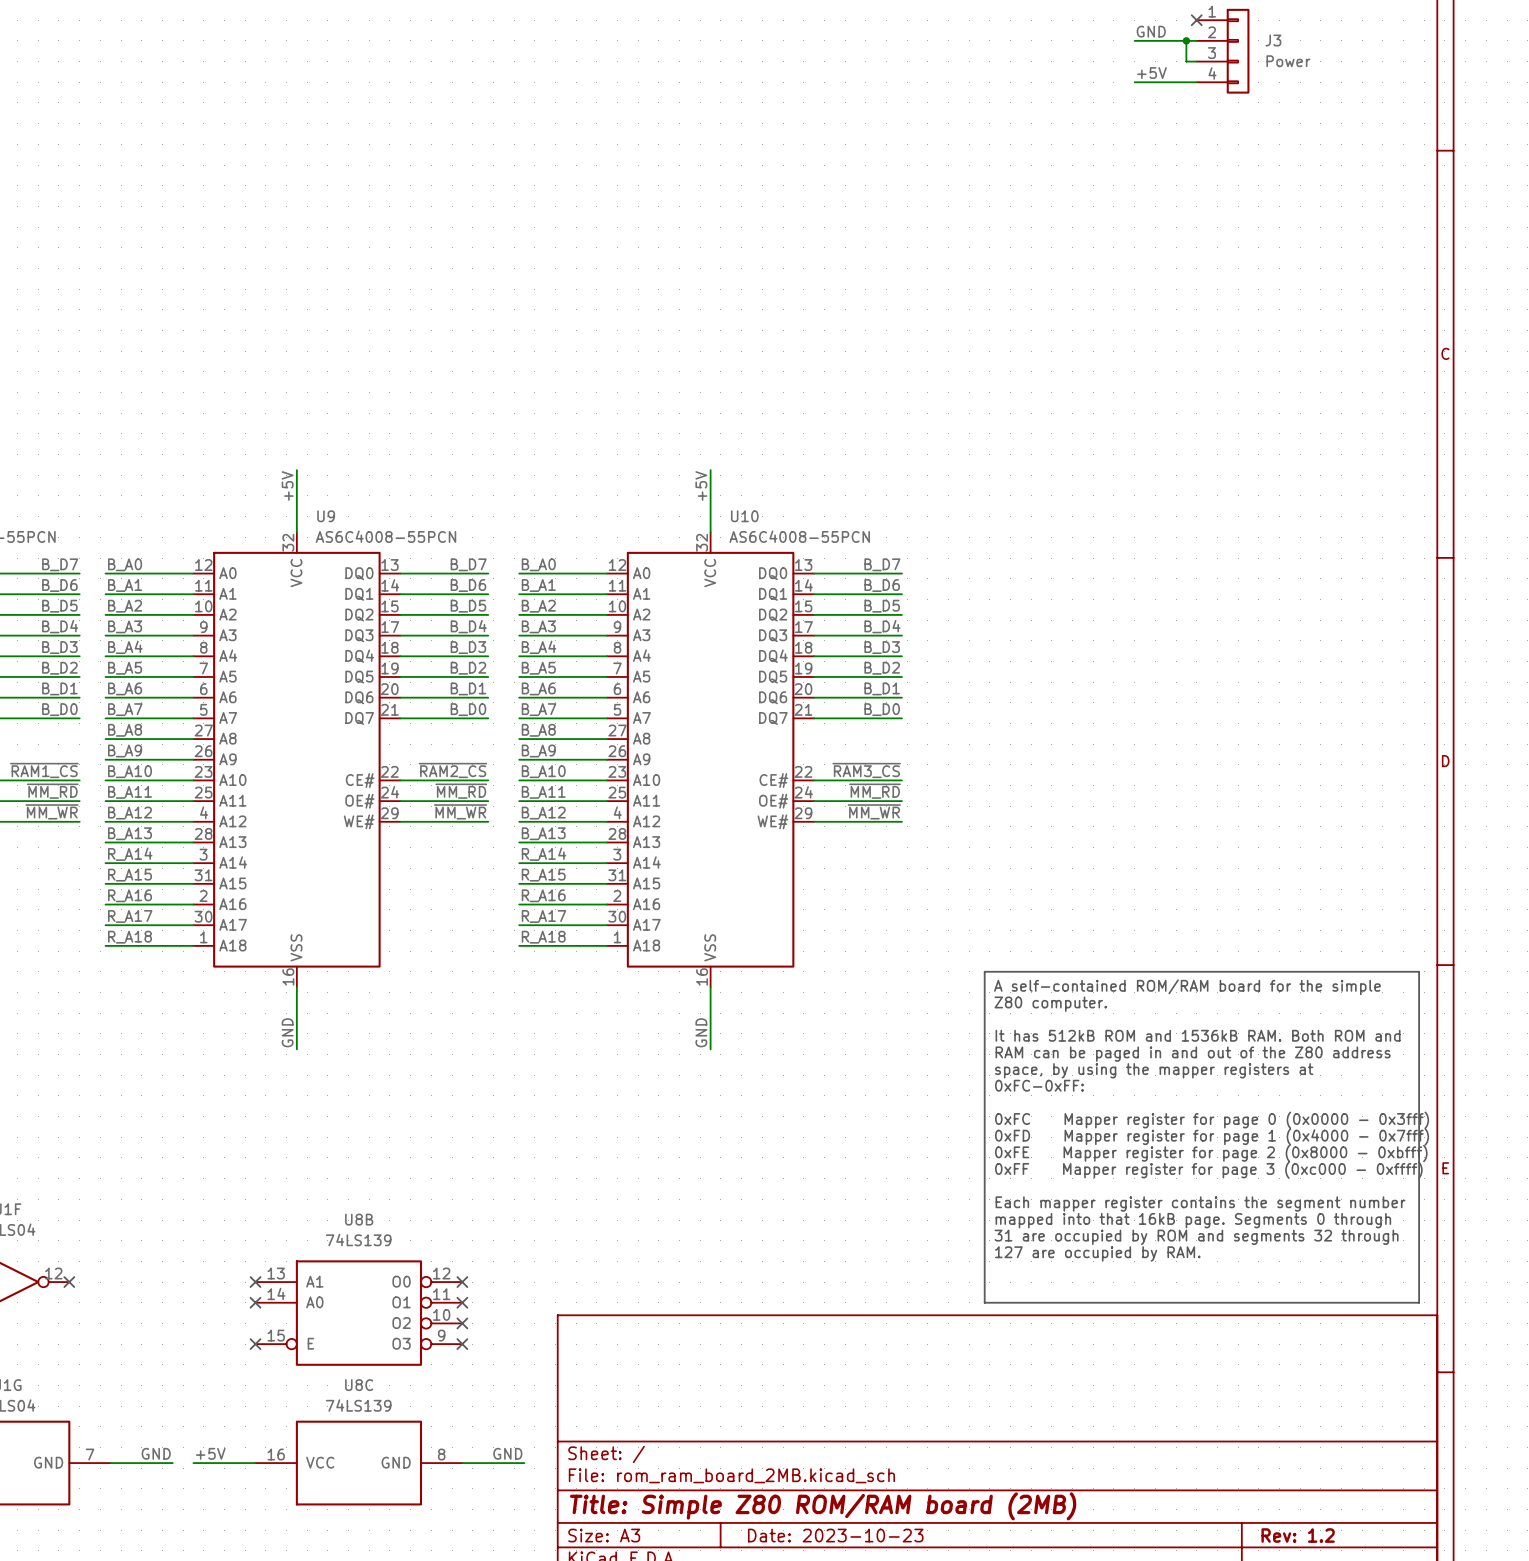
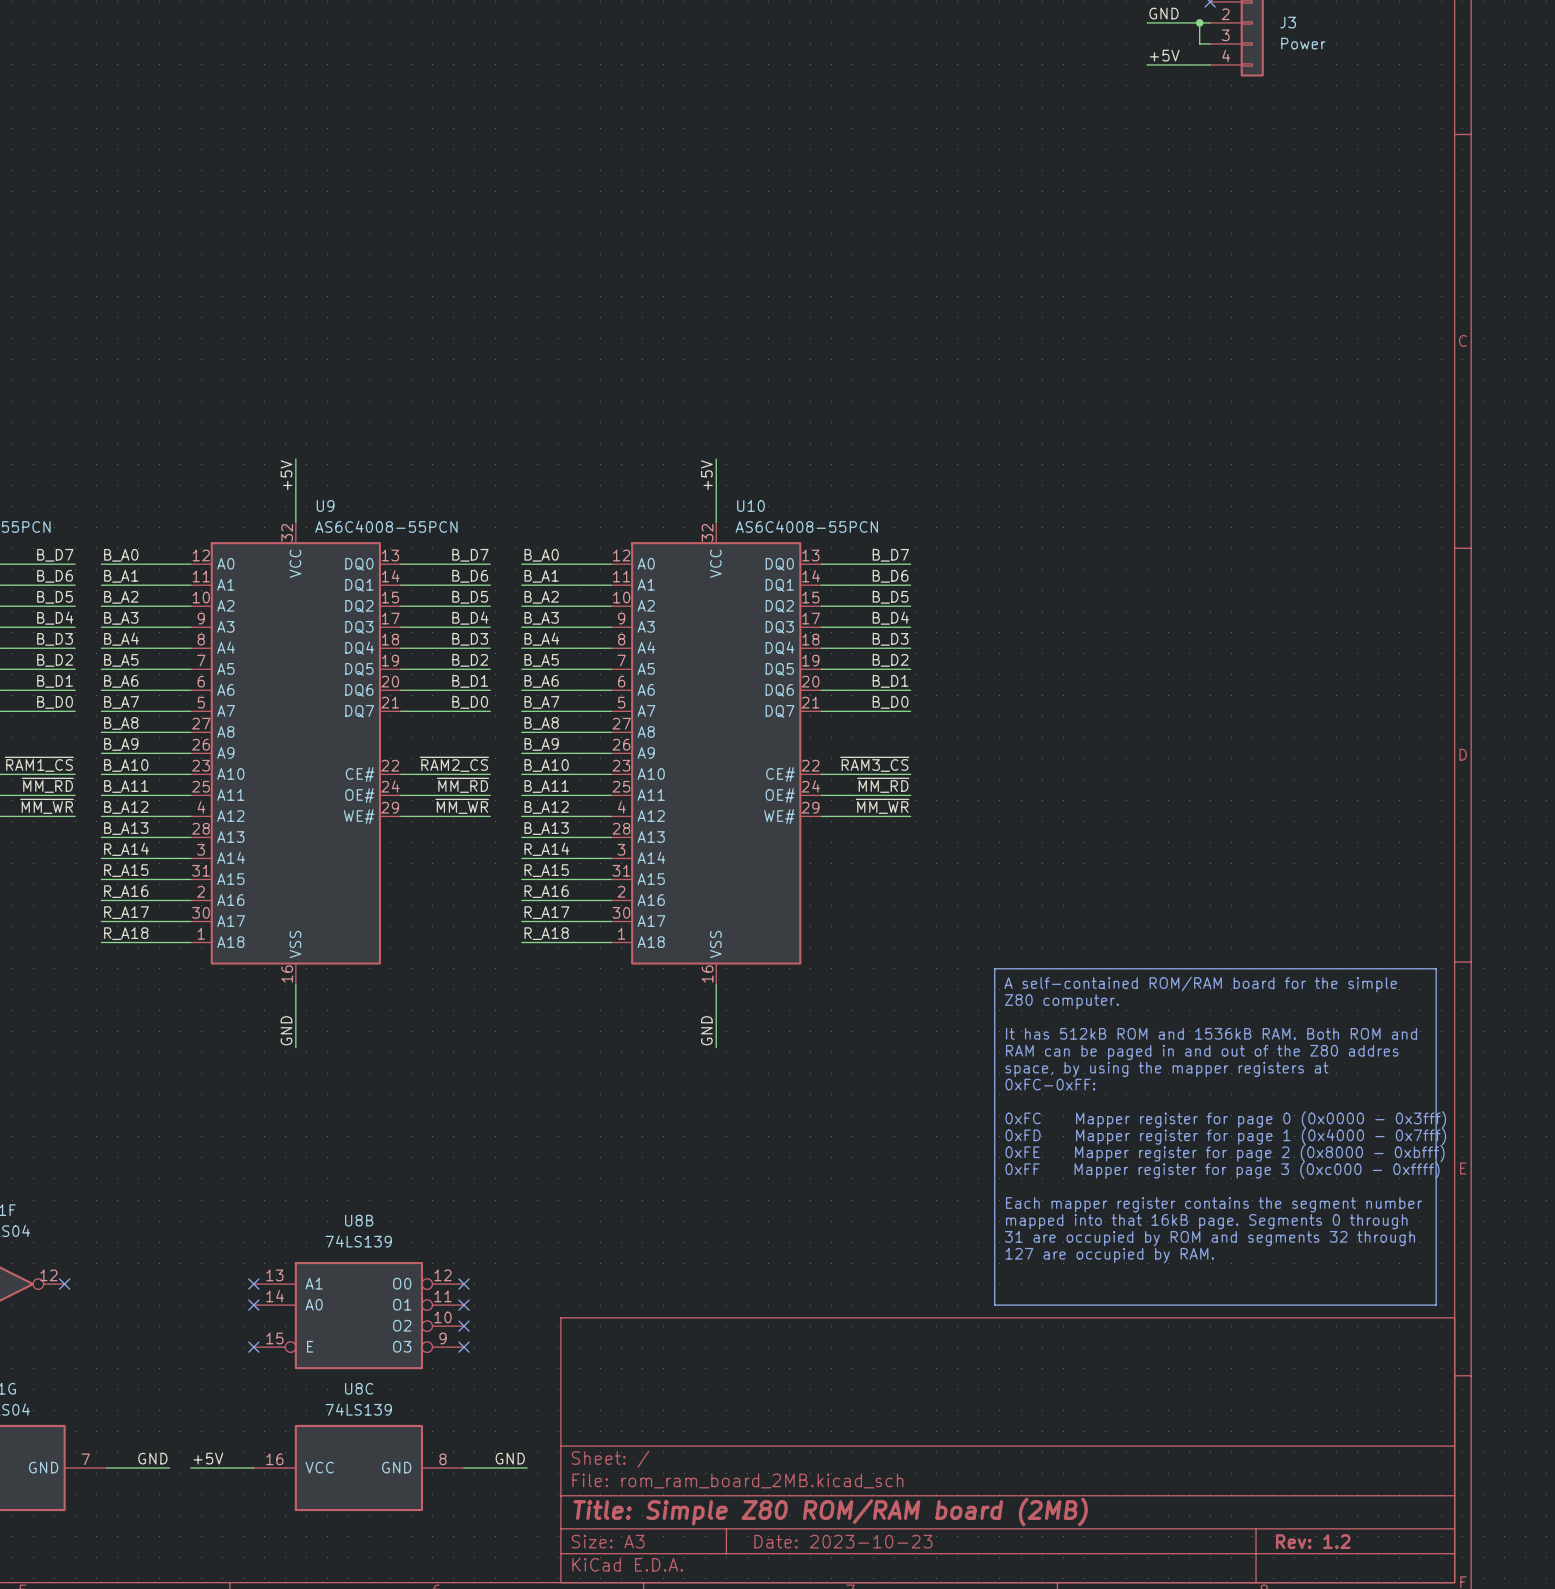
text: RAM can be paged in and out of the Z80 address (1193, 1054) -> RAM can be paged in and out of the Z80 addres (1202, 1052)

